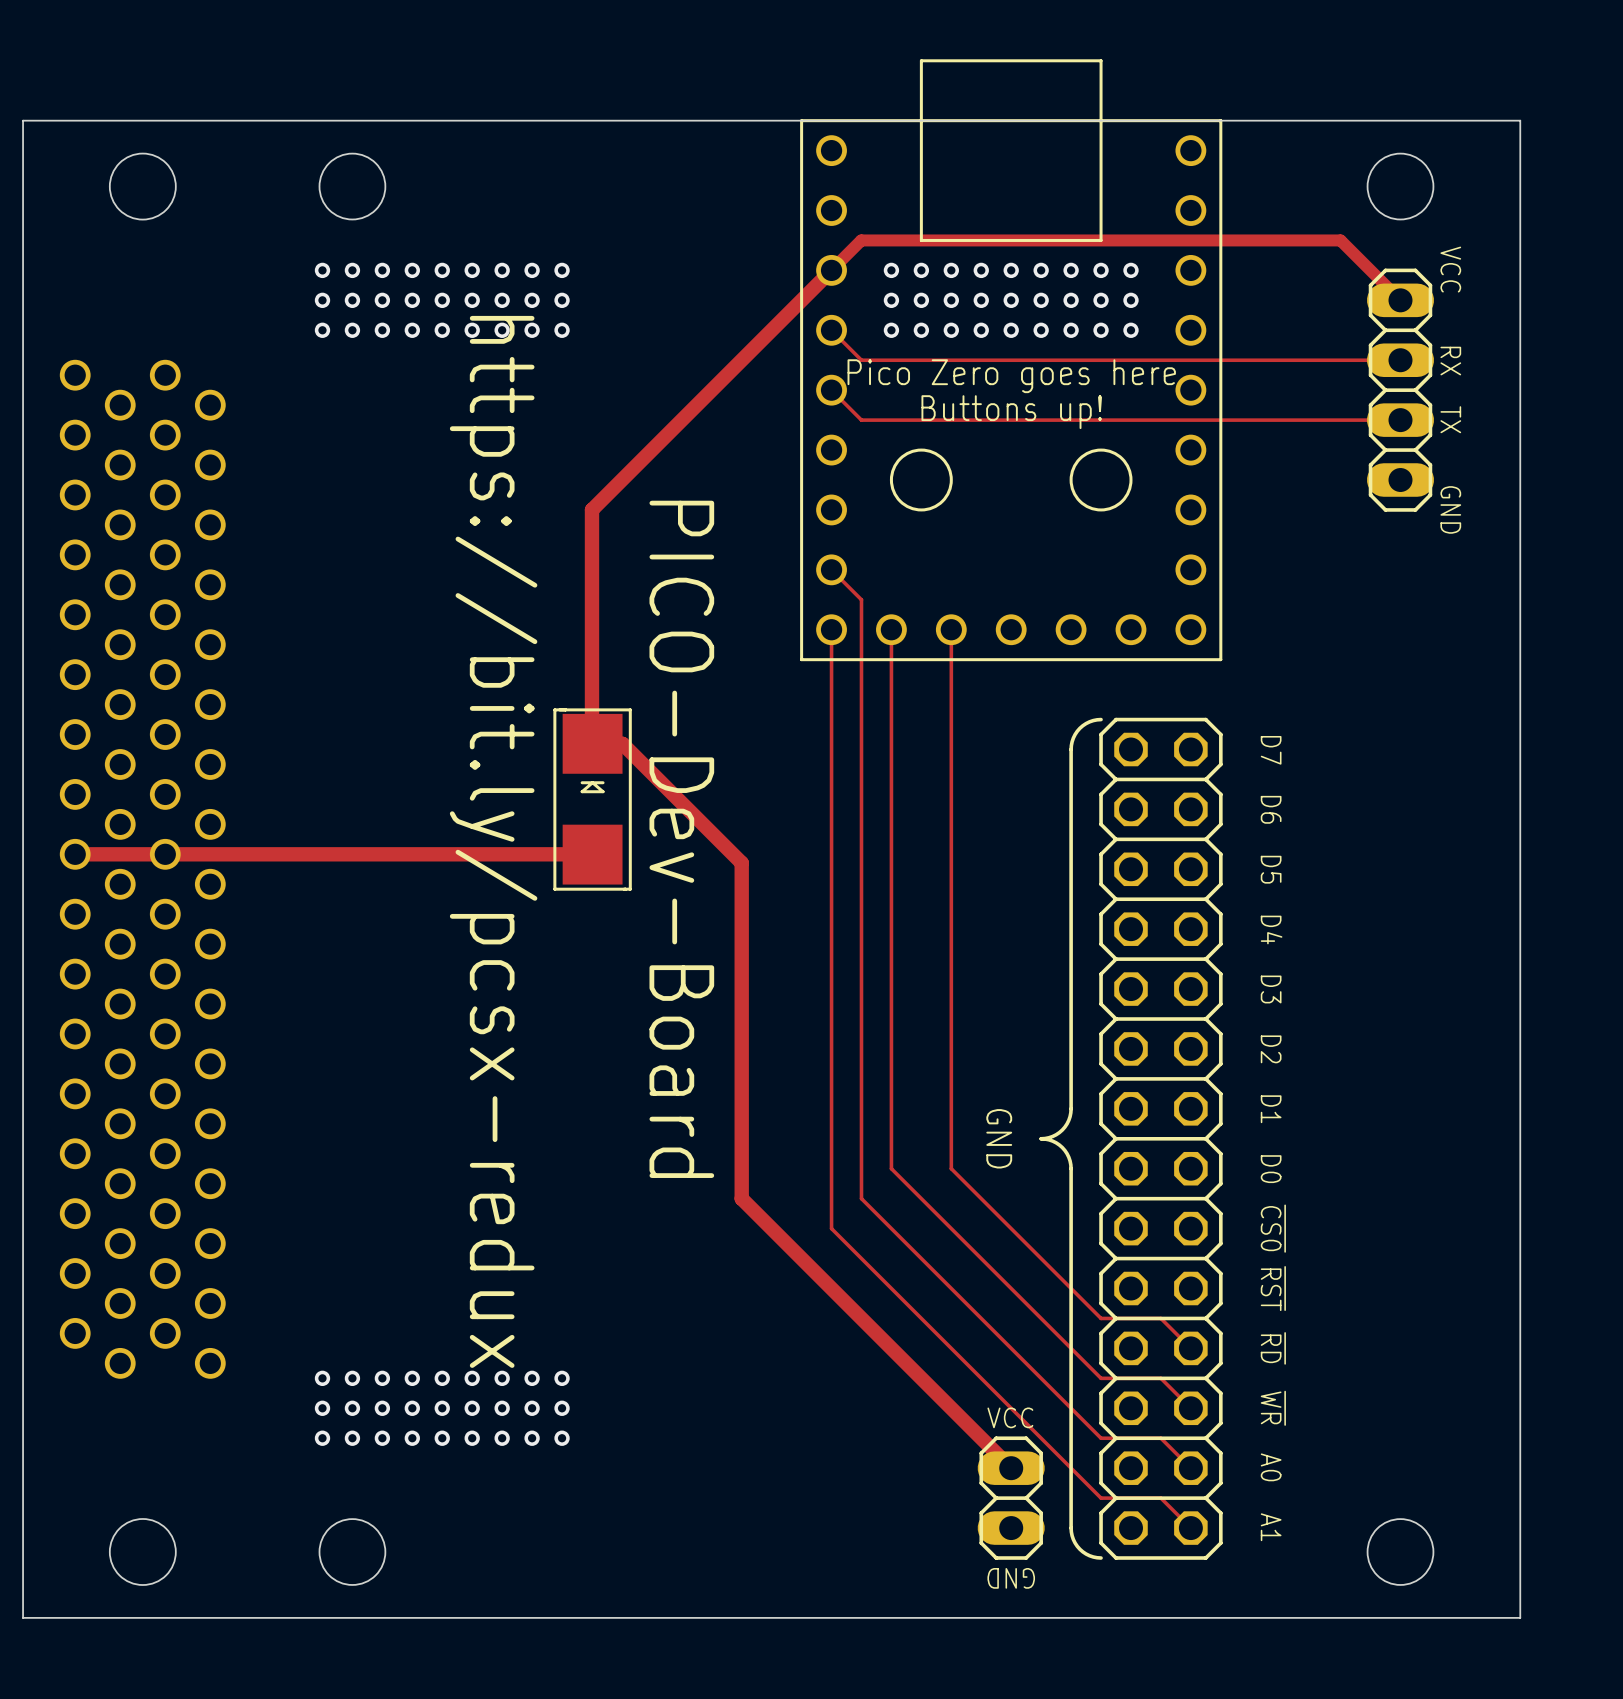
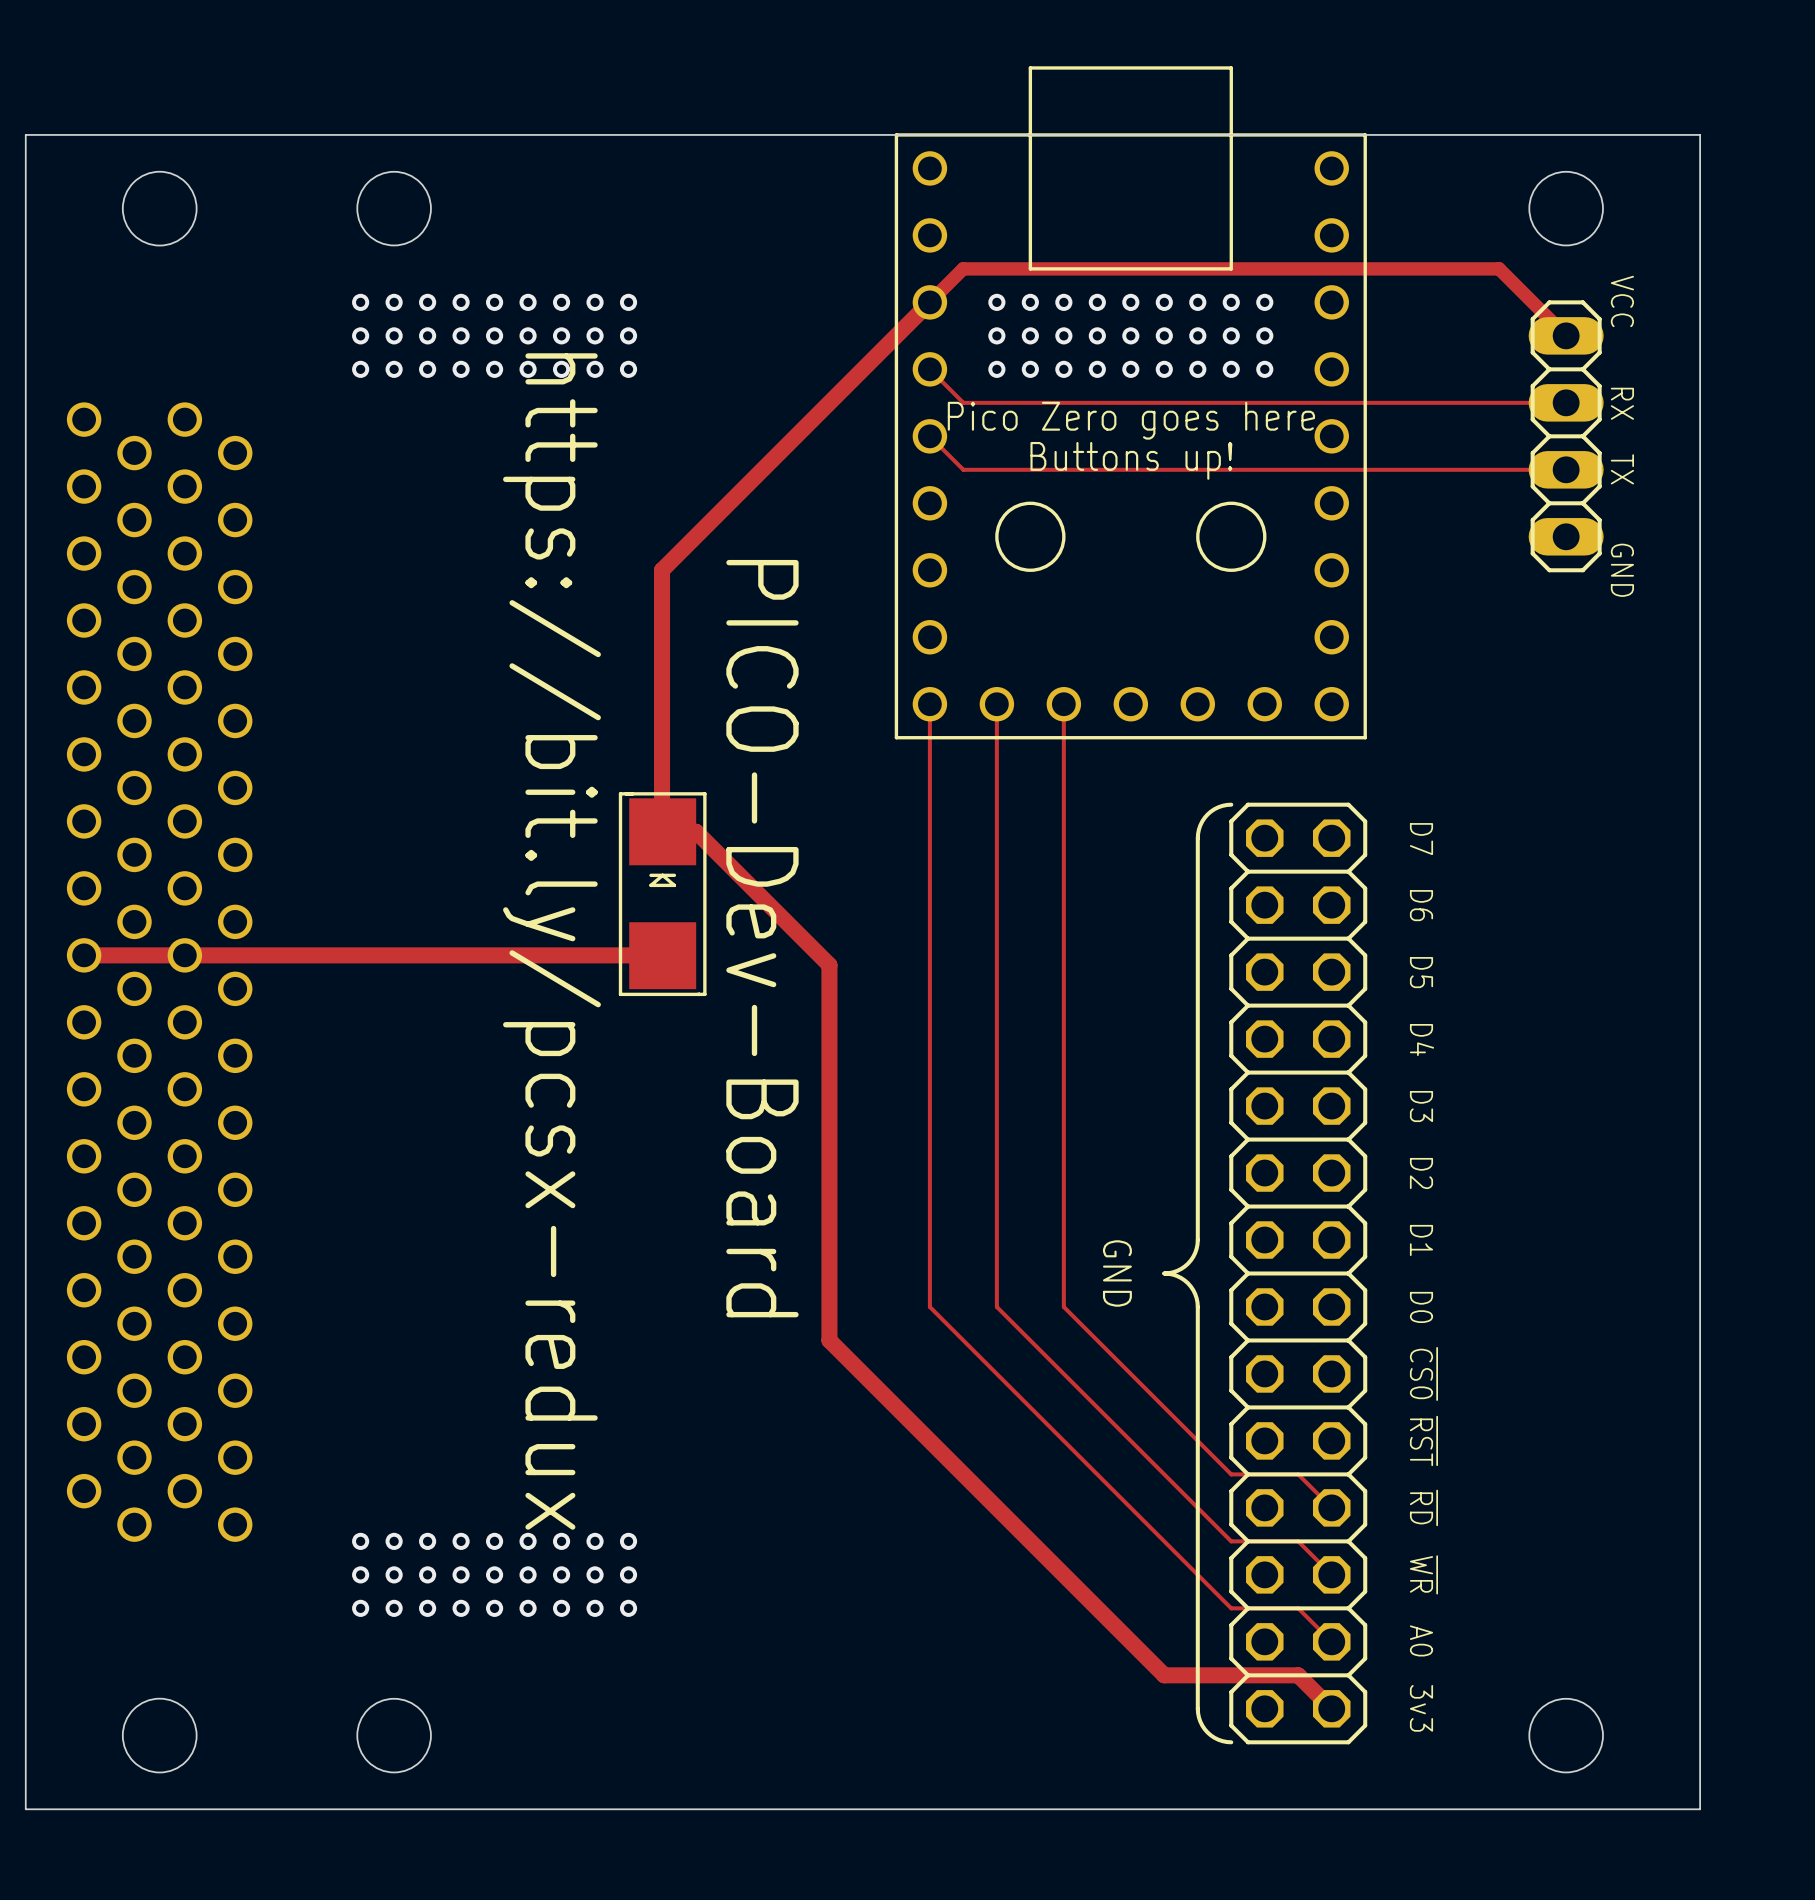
track: (831, 569) (861, 599) (861, 1198) -> (929, 1306) (963, 1340)
track: (831, 1168) (831, 1228) (1101, 1498) -> (1130, 1641) (1164, 1675) (1231, 1675)
text: VCC (1010, 1417) -> none
part: (1011, 1498) -> none
track width: thin (1101, 1498) (1160, 1498) (1190, 1528) -> thick (1231, 1675) (1298, 1675) (1331, 1708)
text: A1 (1271, 1527) -> 3v3 (1421, 1708)
text: GND (1011, 1578) -> none

